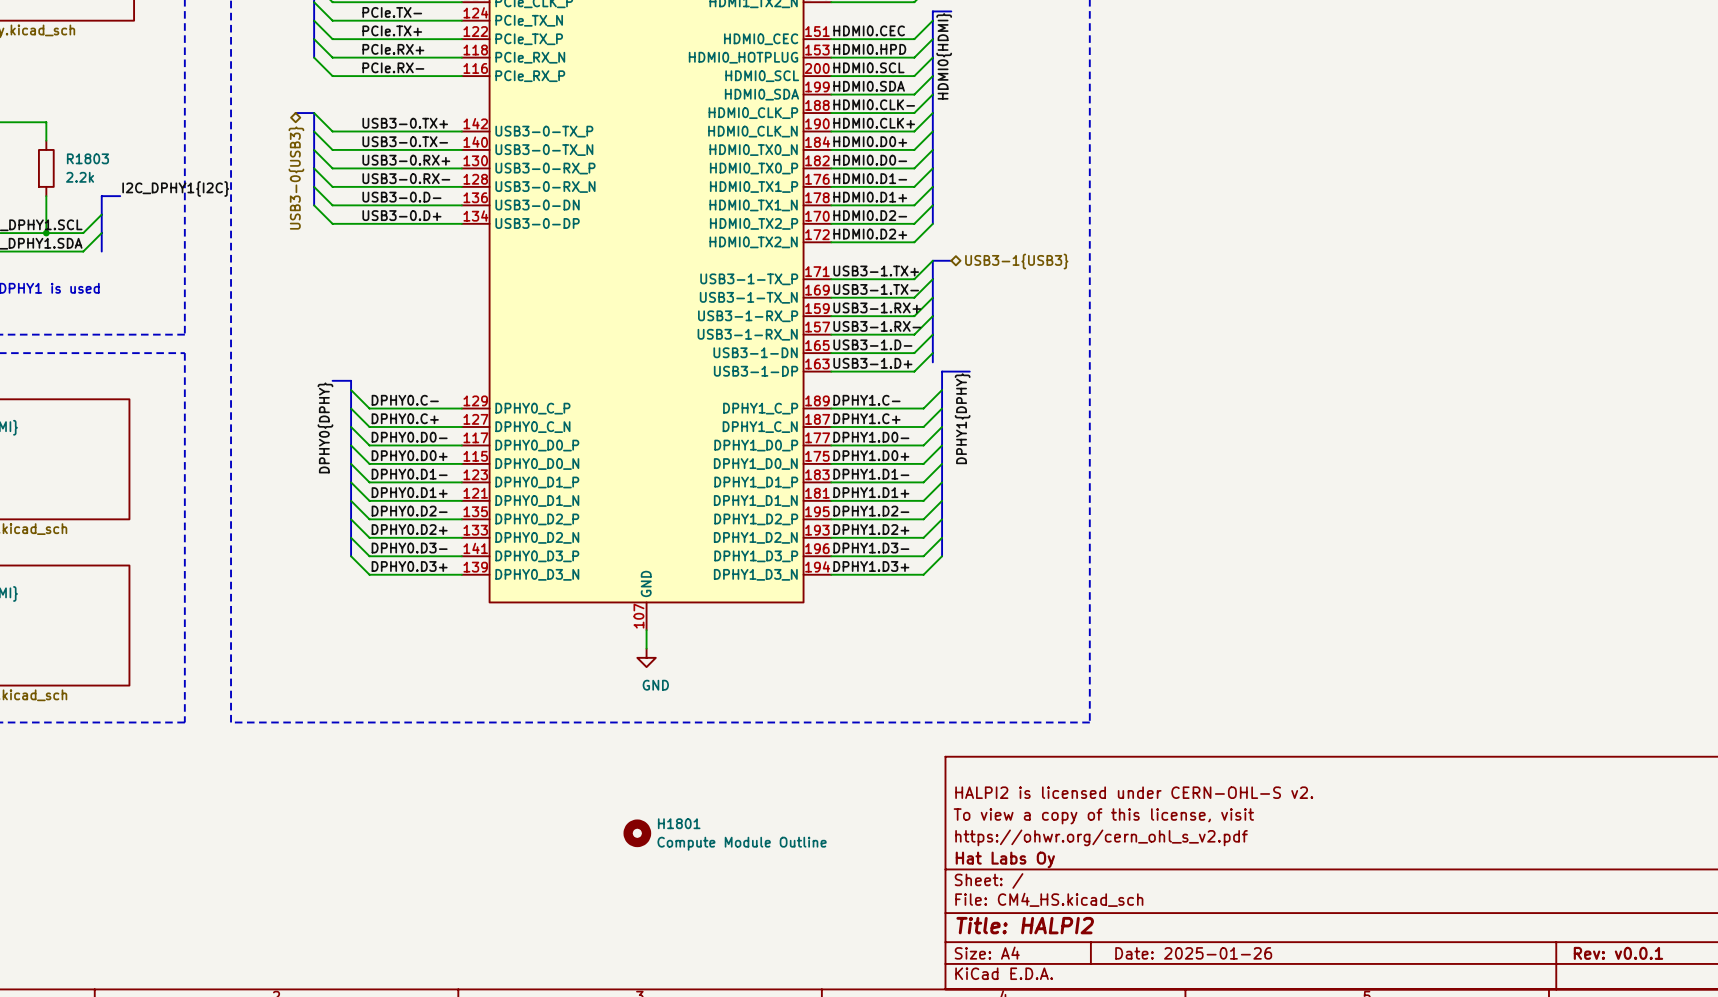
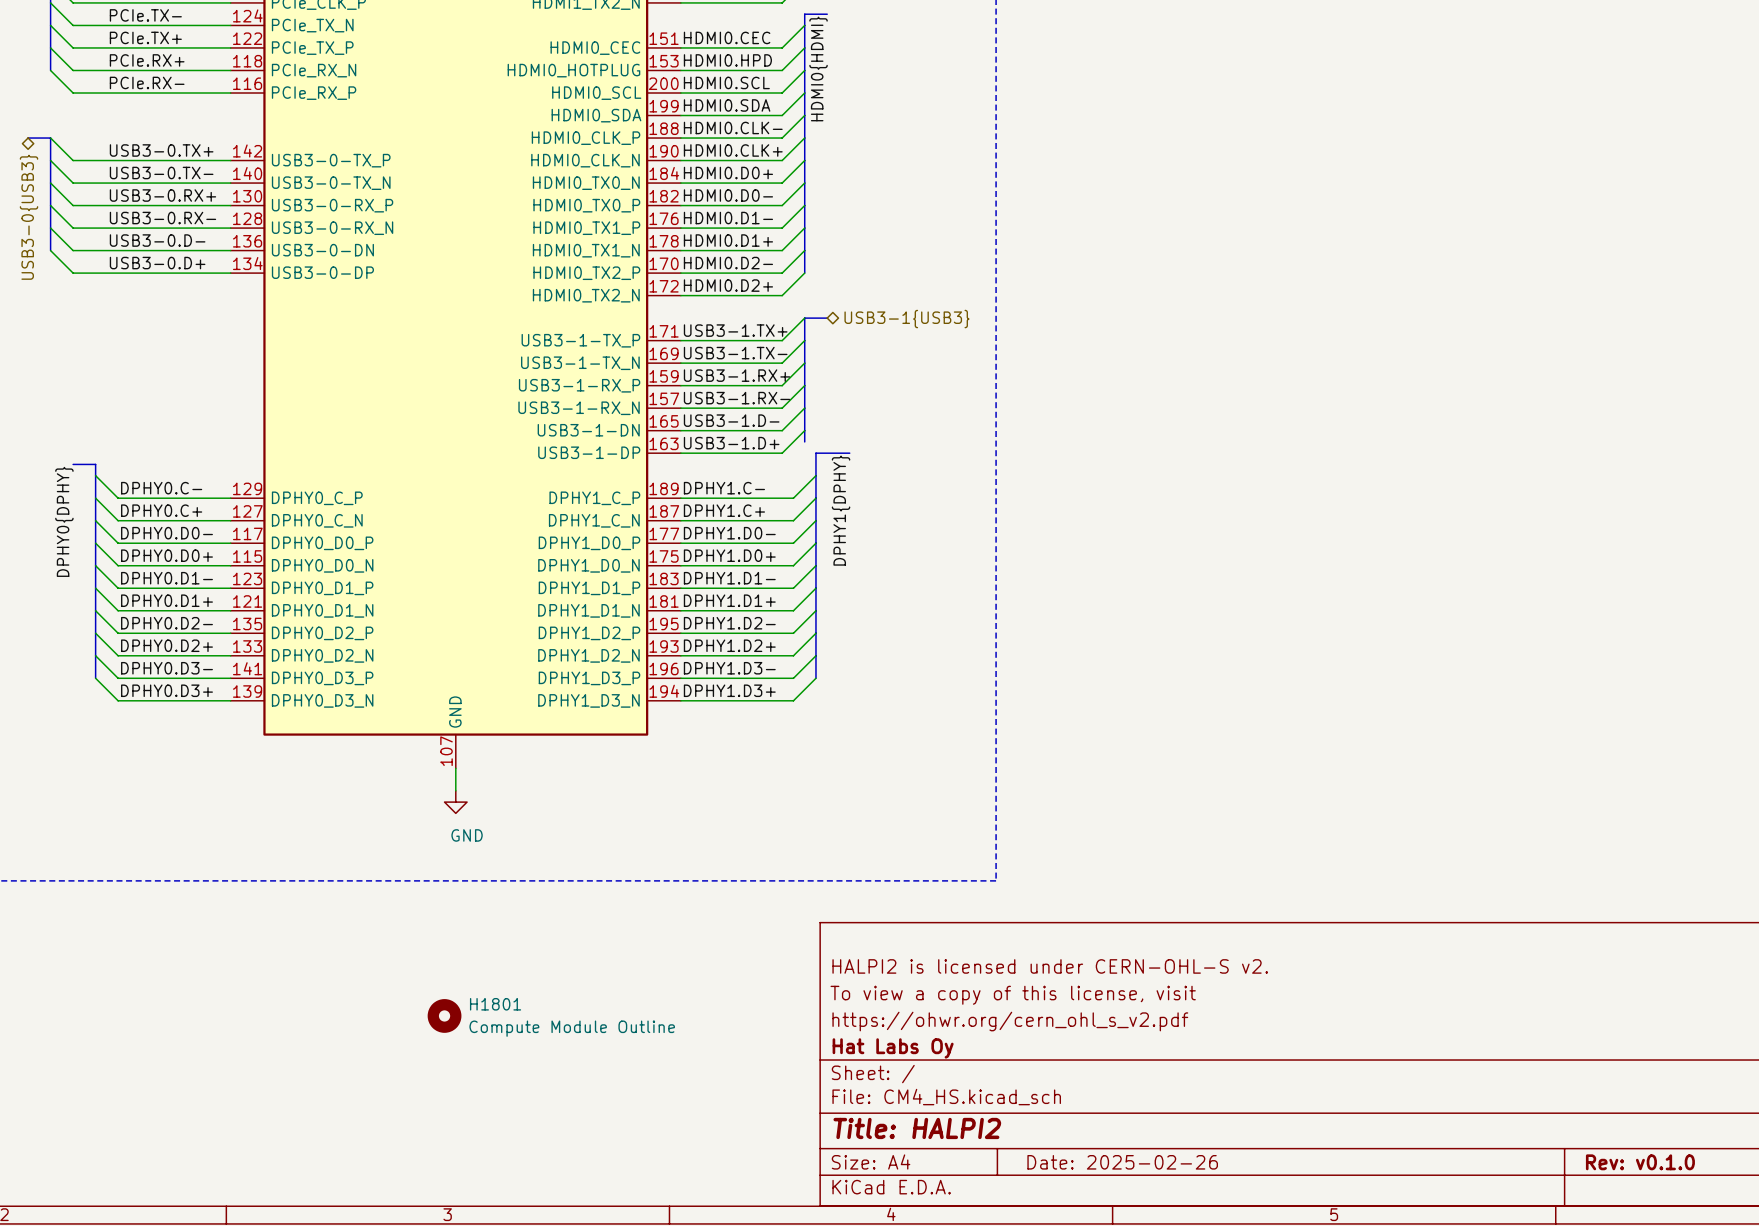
title block: Date: 2025-01-26 (1193, 953) -> Date: 2025-02-26 (1122, 1162)
title block: Rev: v0.0.1 (1618, 953) -> Rev: v0.1.0 (1640, 1162)

